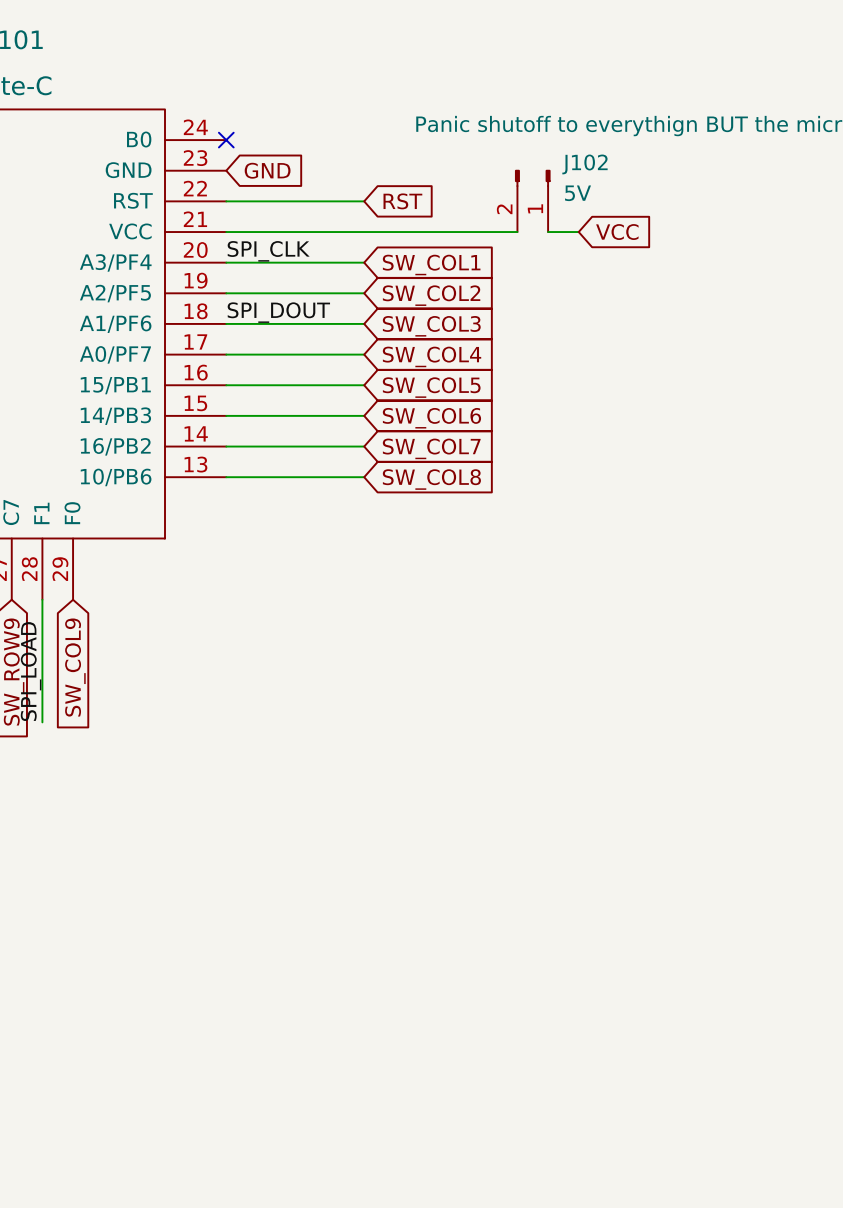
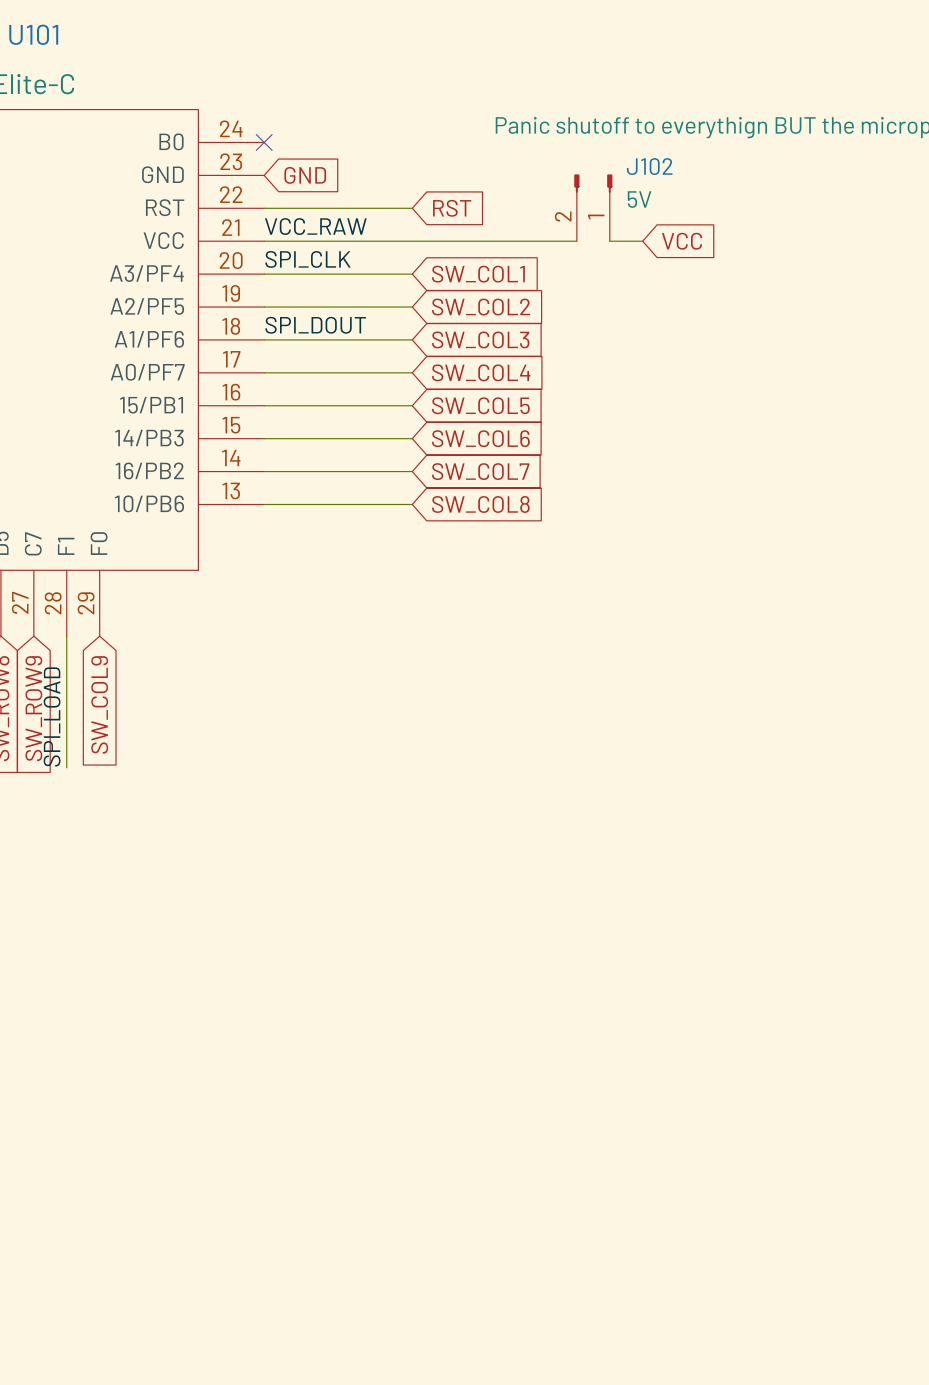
label: none -> VCC_RAW (315, 226)

